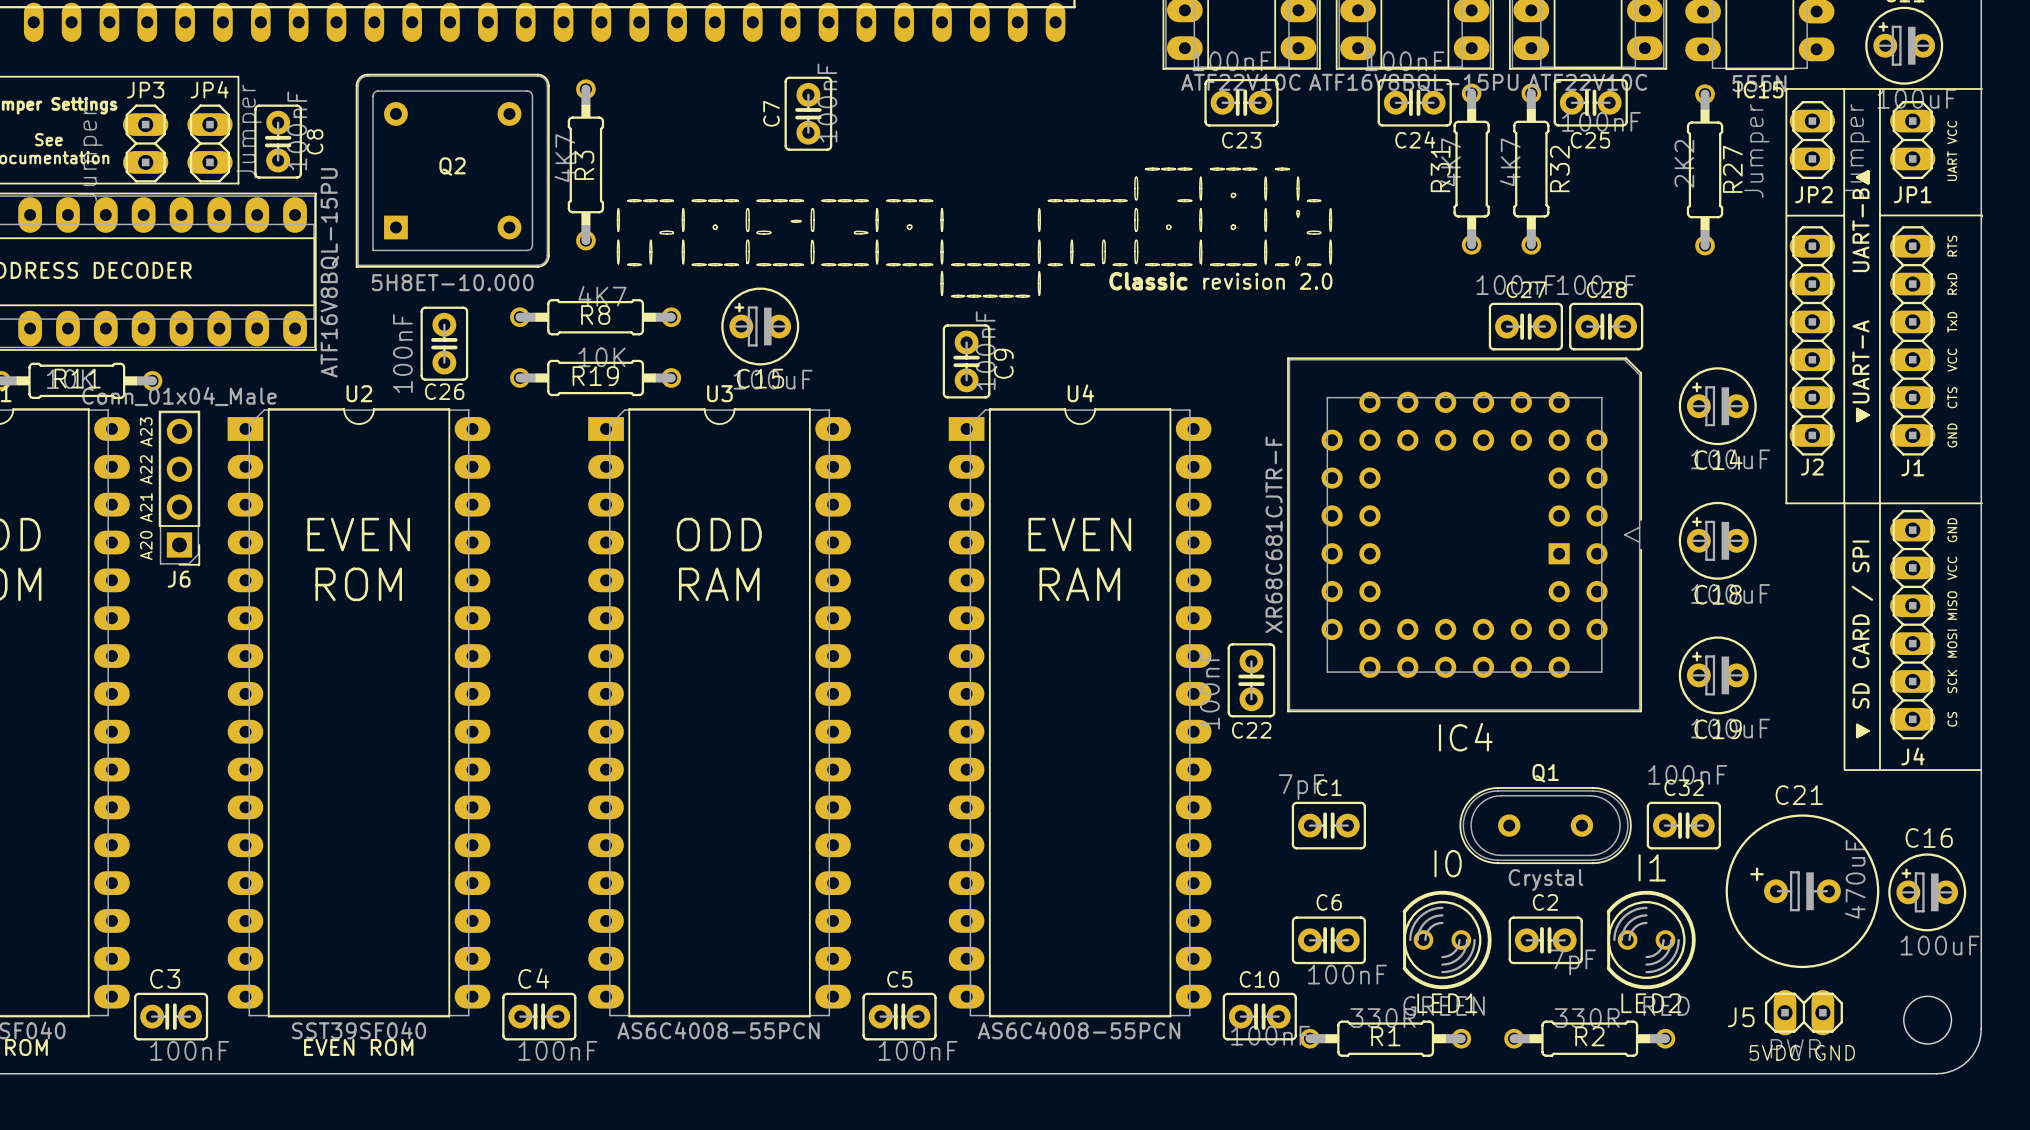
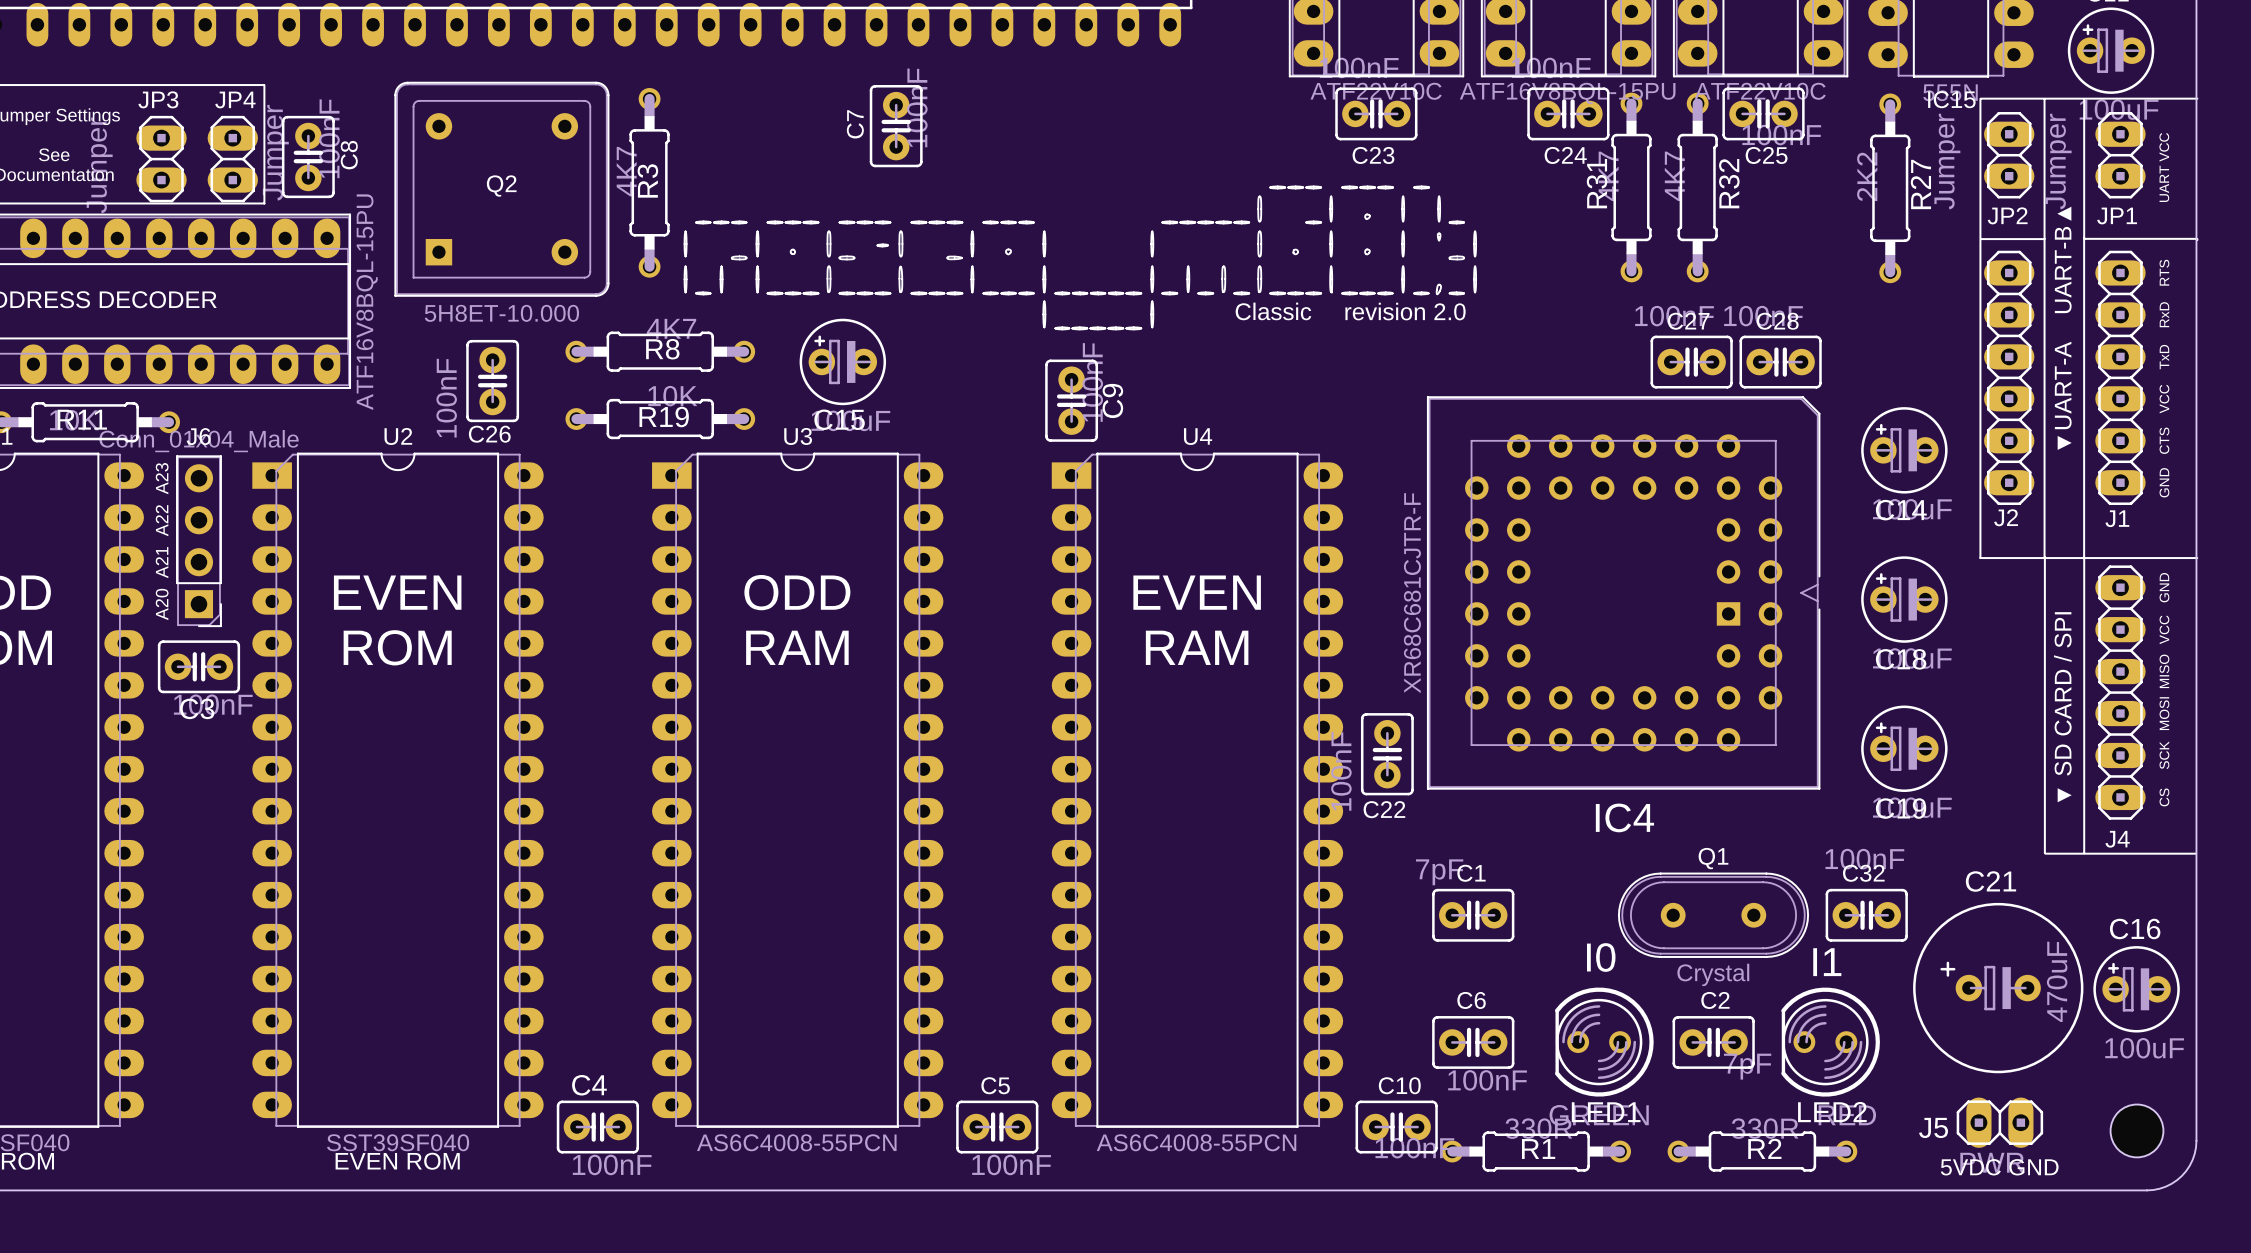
J6 name position: J6 (179, 579) -> J6 (198, 436)
C3 name position: C3 (165, 978) -> C3 (197, 708)
C3 position: (171, 1016) -> (198, 666)

